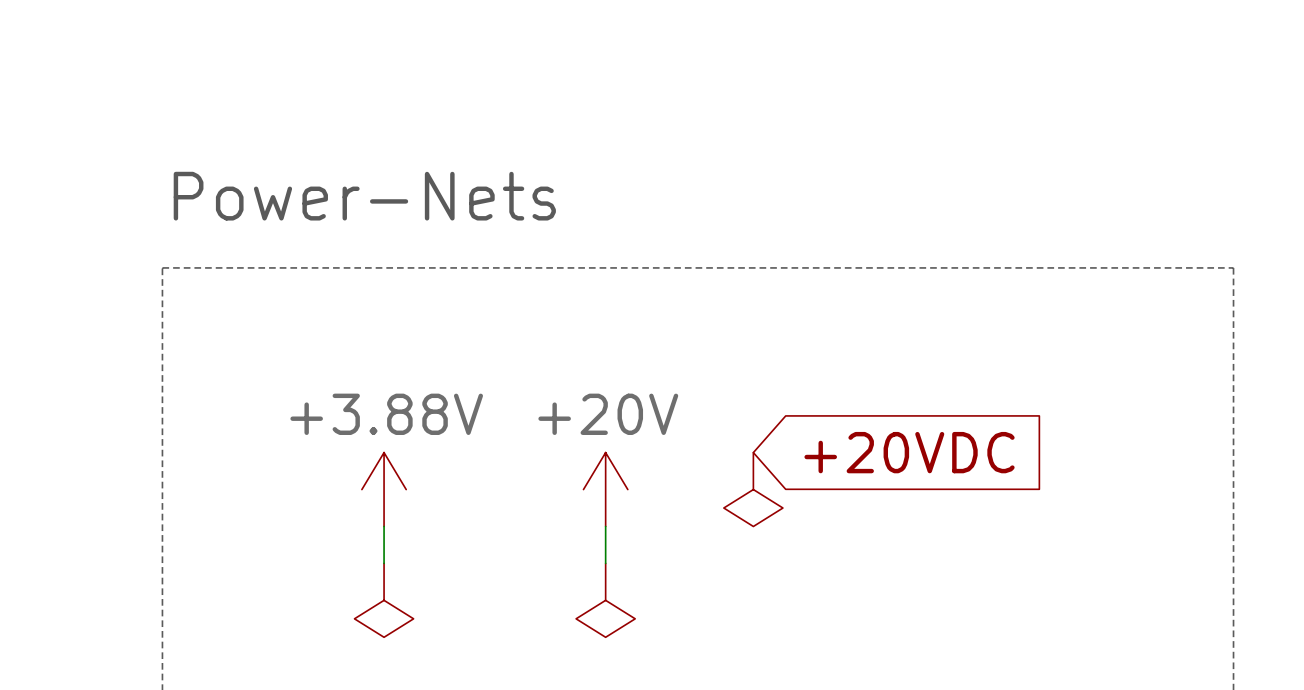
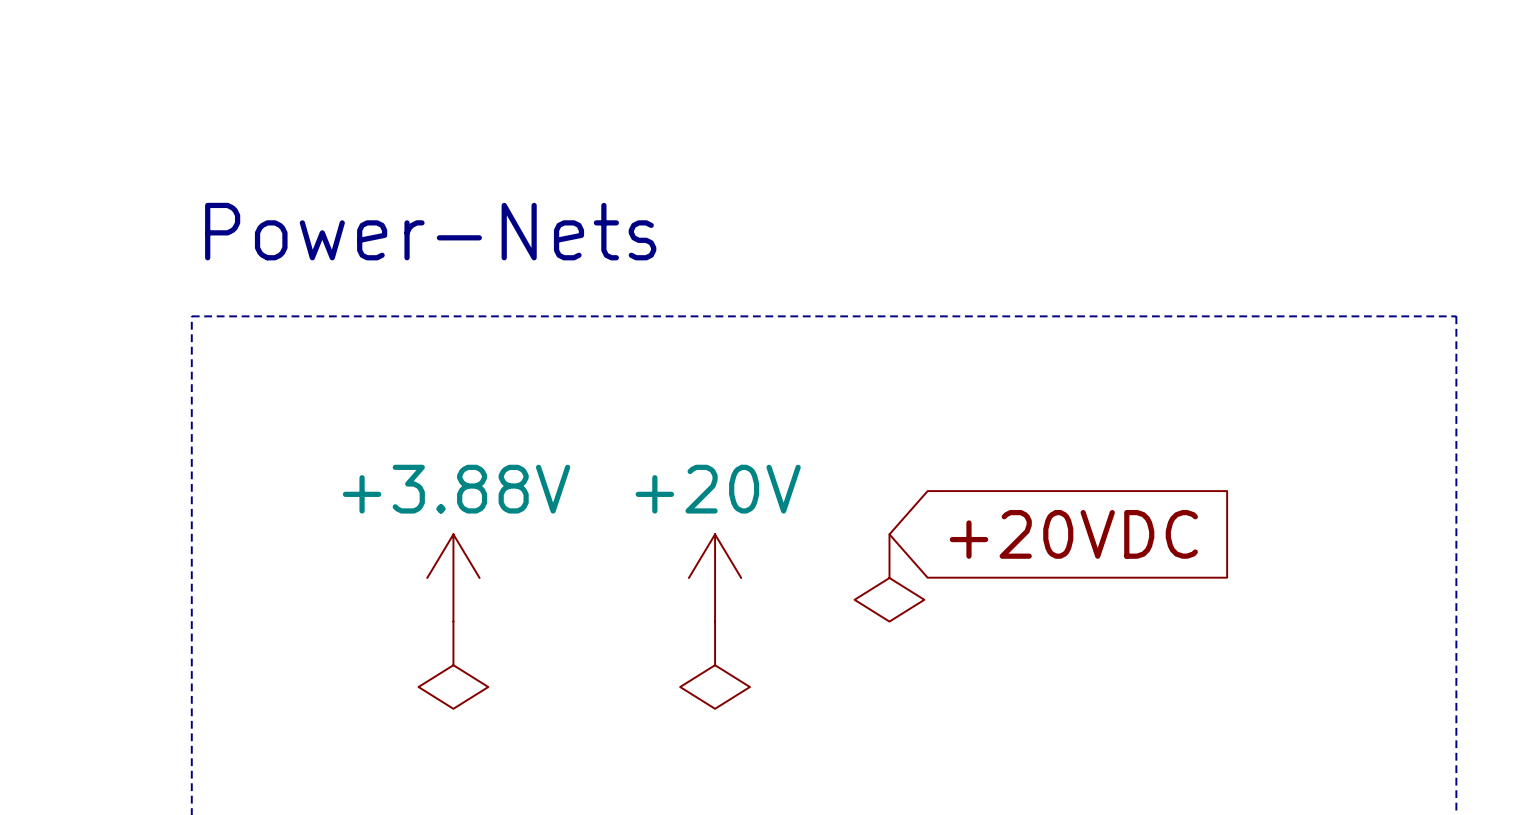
power symbol position: (384, 600) -> (453, 665)
power symbol position: (605, 600) -> (715, 665)

